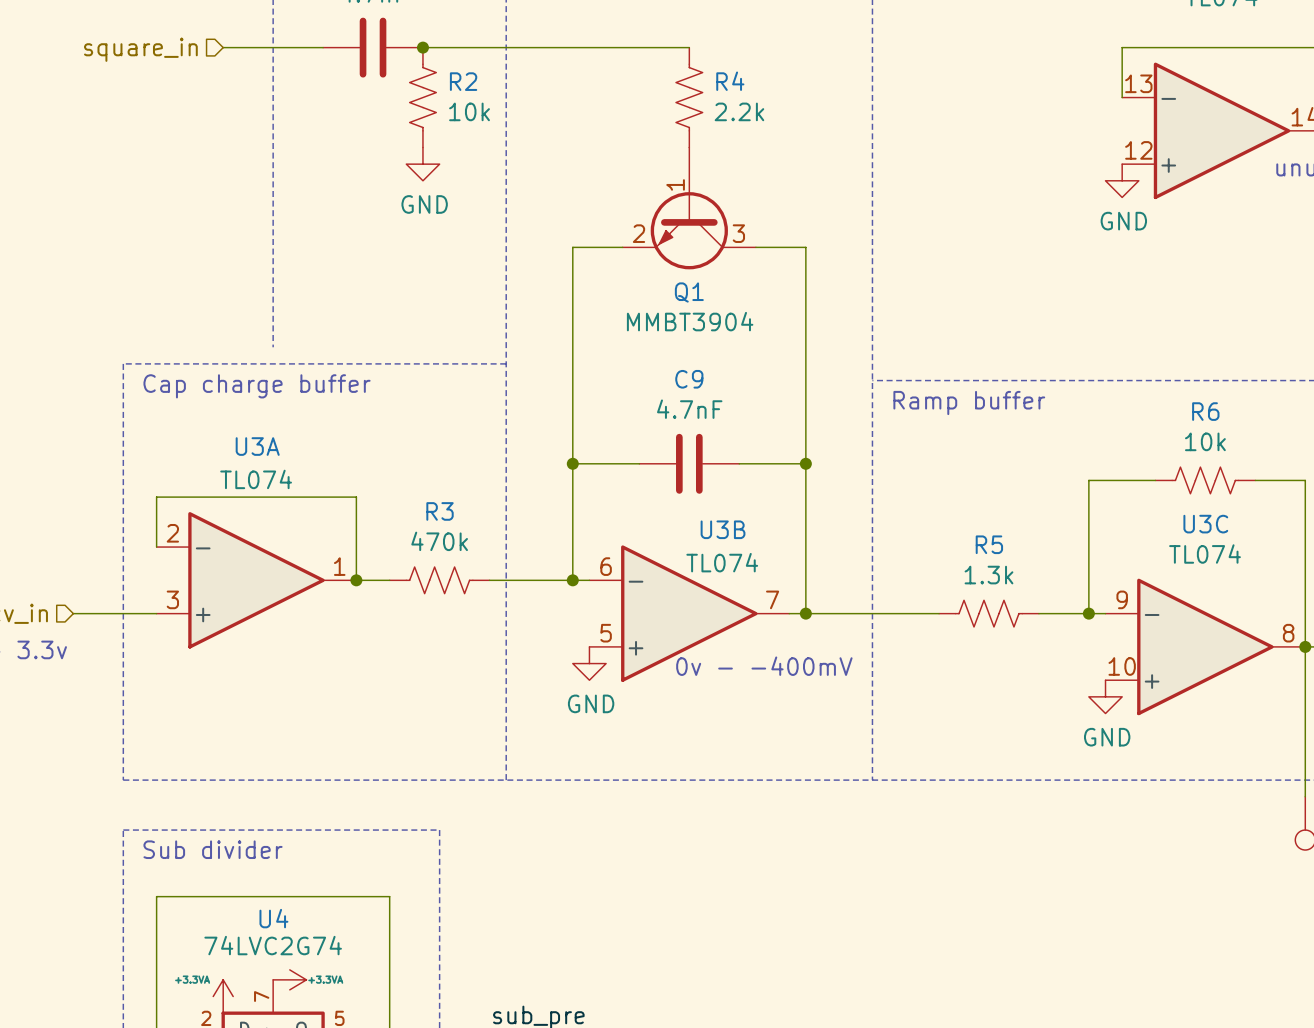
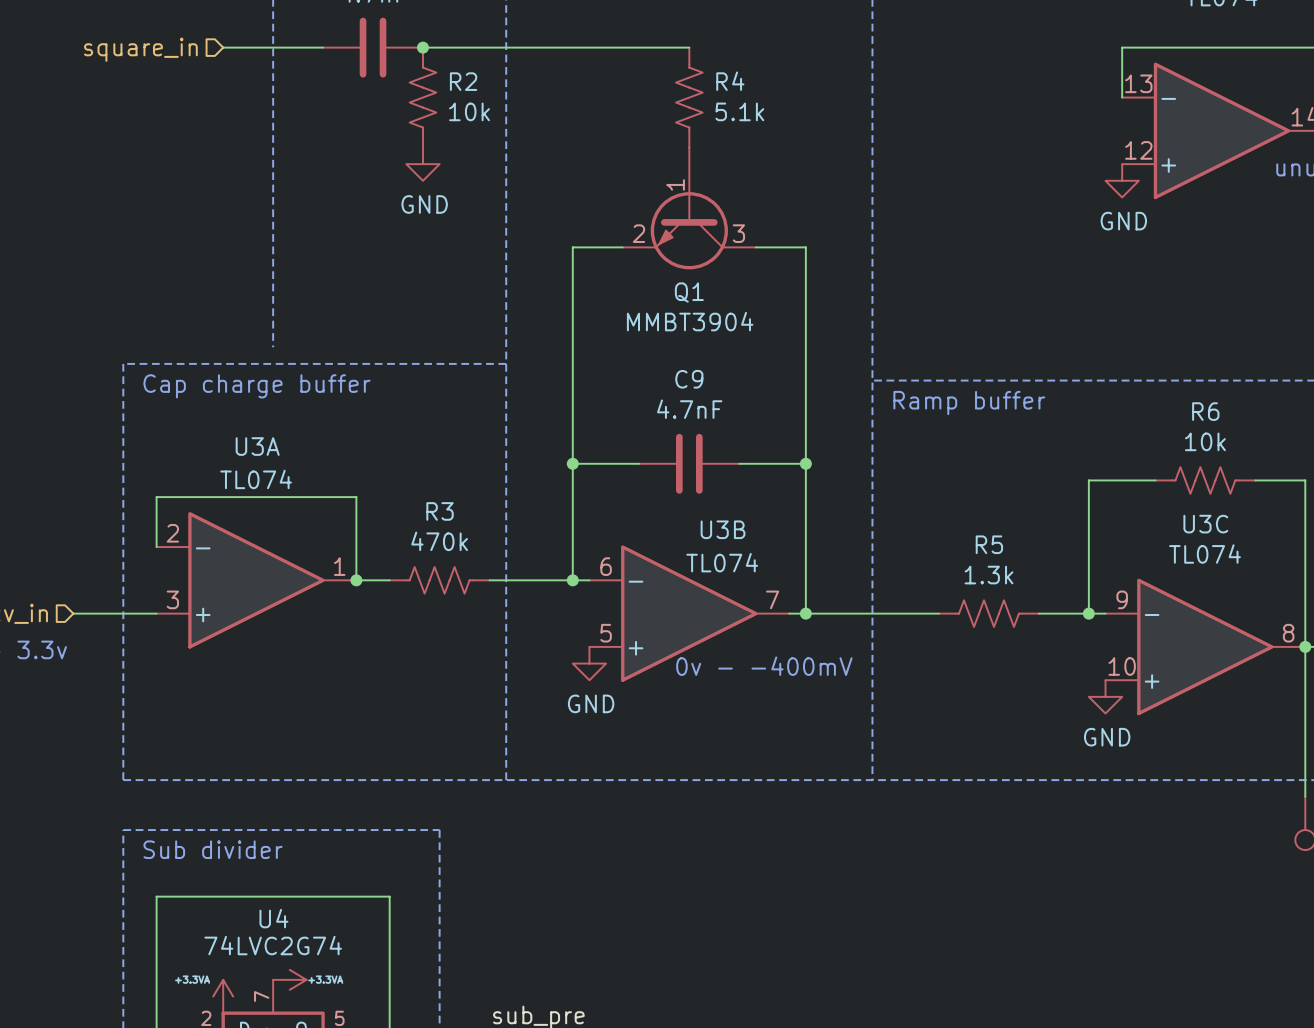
R4 value: 2.2k (739, 111) -> 5.1k (739, 111)

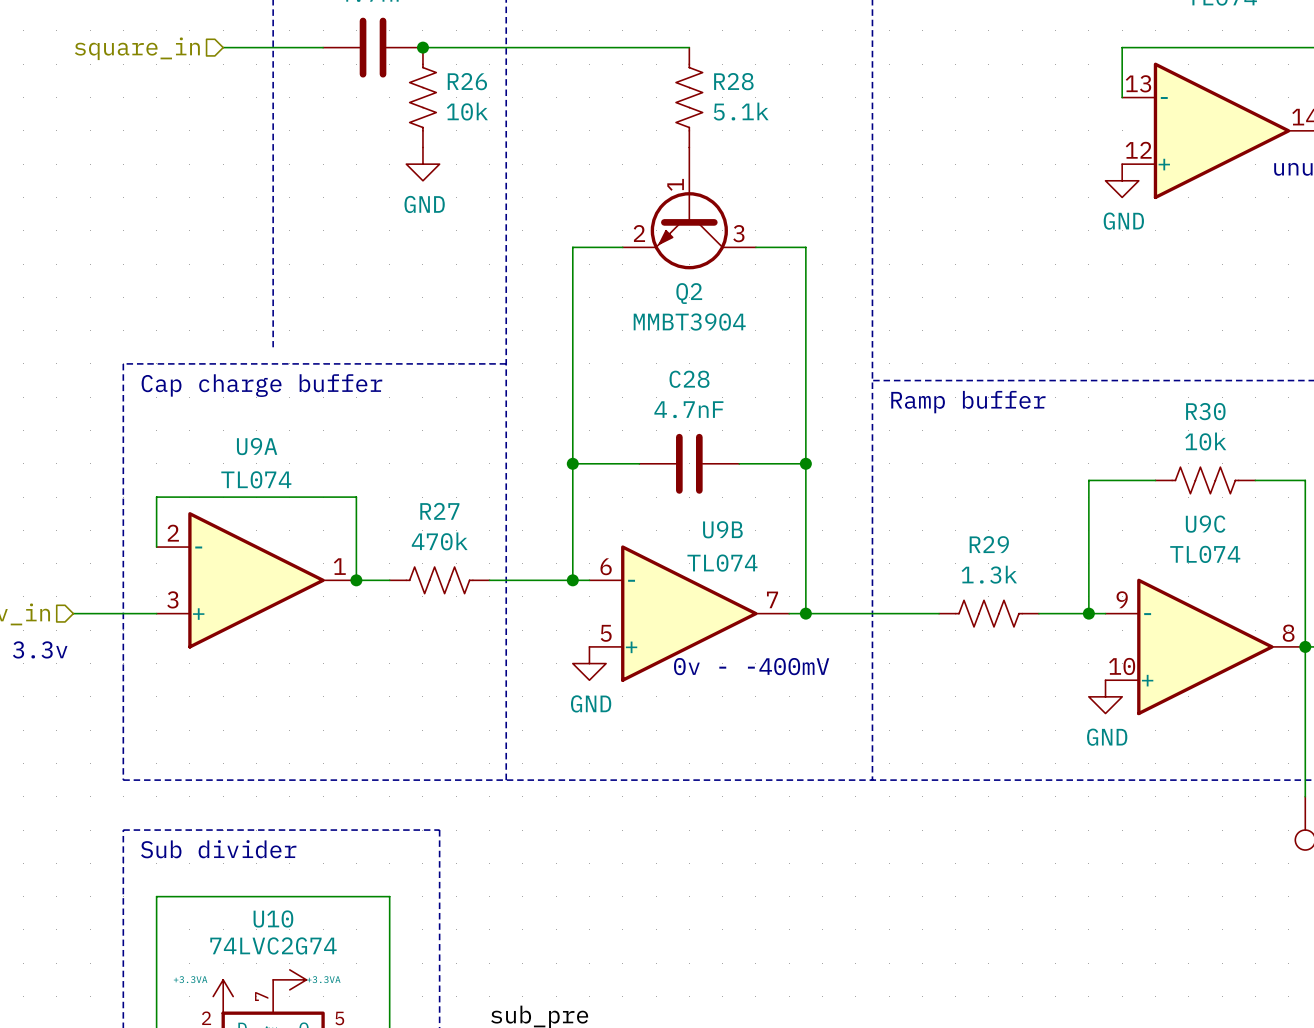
R2 name: R2 (463, 81) -> R26 (467, 81)
R4 name: R4 (730, 81) -> R28 (733, 81)
Q1 name: Q1 (689, 292) -> Q2 (689, 293)
C9 name: C9 (689, 379) -> C28 (689, 379)
R6 name: R6 (1205, 411) -> R30 (1205, 411)
U3A name: U3A (257, 446) -> U9A (257, 446)
R3 name: R3 (440, 511) -> R27 (439, 511)
U3C name: U3C (1205, 524) -> U9C (1205, 524)
U3B name: U3B (723, 529) -> U9B (722, 529)
R5 name: R5 (989, 544) -> R29 (989, 544)
U4 name: U4 (273, 918) -> U10 (273, 918)

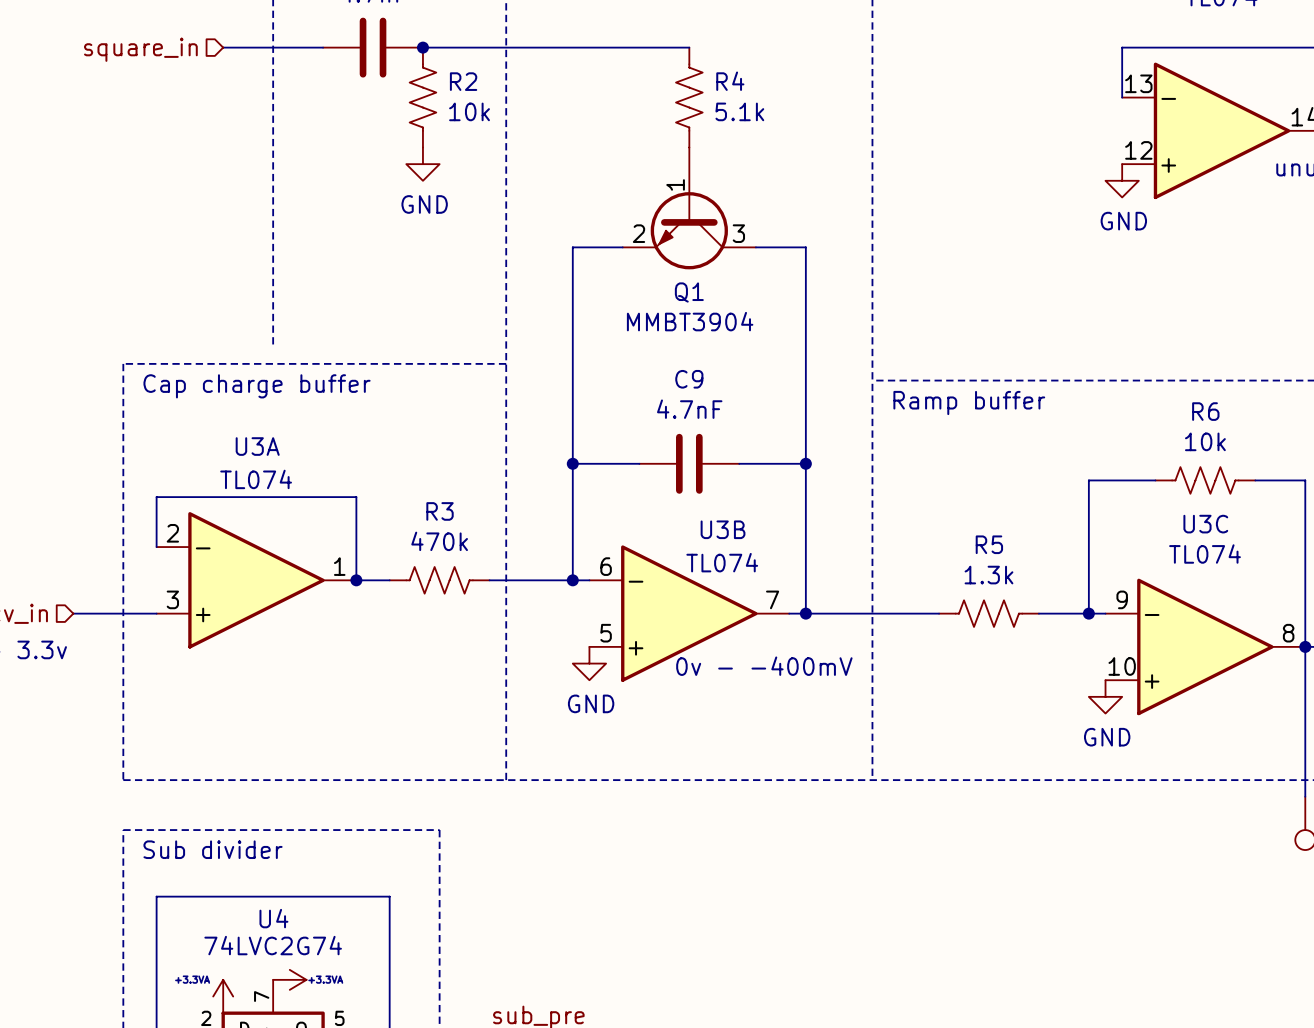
R26 name: R26 (467, 81) -> R2 (463, 81)
R28 name: R28 (733, 81) -> R4 (730, 81)
Q2 name: Q2 (689, 293) -> Q1 (689, 292)
C28 name: C28 (689, 379) -> C9 (689, 379)
R30 name: R30 (1205, 411) -> R6 (1205, 411)
U9A name: U9A (257, 446) -> U3A (257, 446)
R27 name: R27 (439, 511) -> R3 (440, 511)
U9C name: U9C (1205, 524) -> U3C (1205, 524)
U9B name: U9B (722, 529) -> U3B (723, 529)
R29 name: R29 (989, 544) -> R5 (989, 544)
U10 name: U10 (273, 918) -> U4 (273, 918)

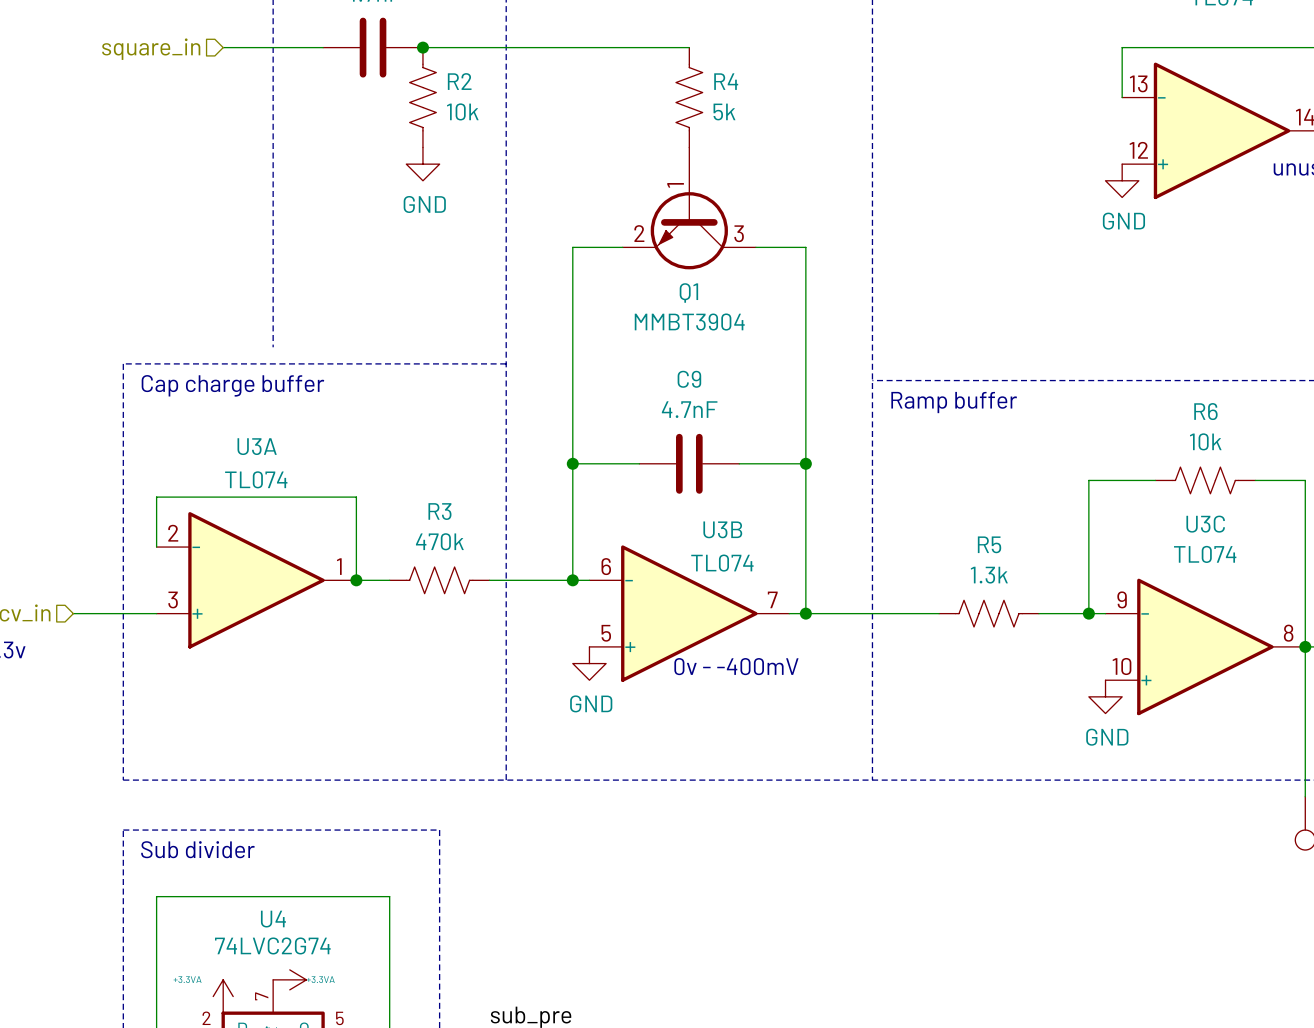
R4 value: 5.1k (739, 111) -> 5k (724, 112)

